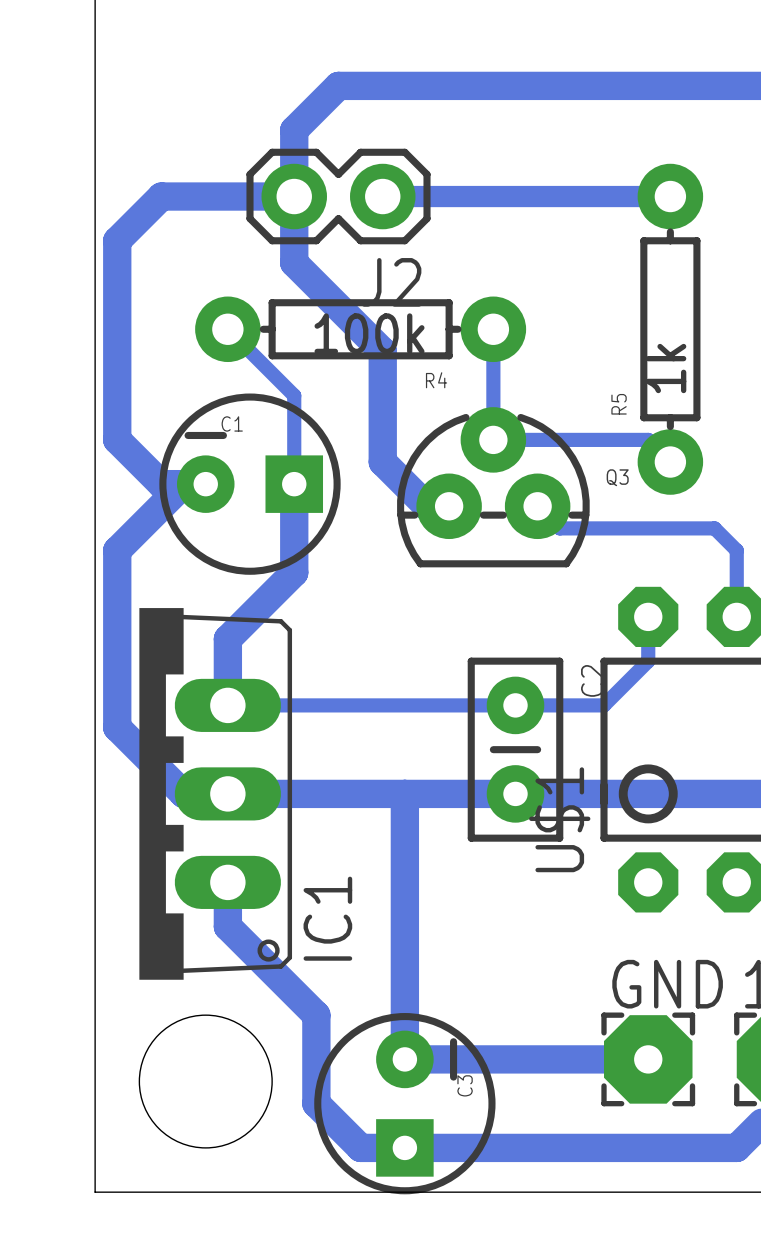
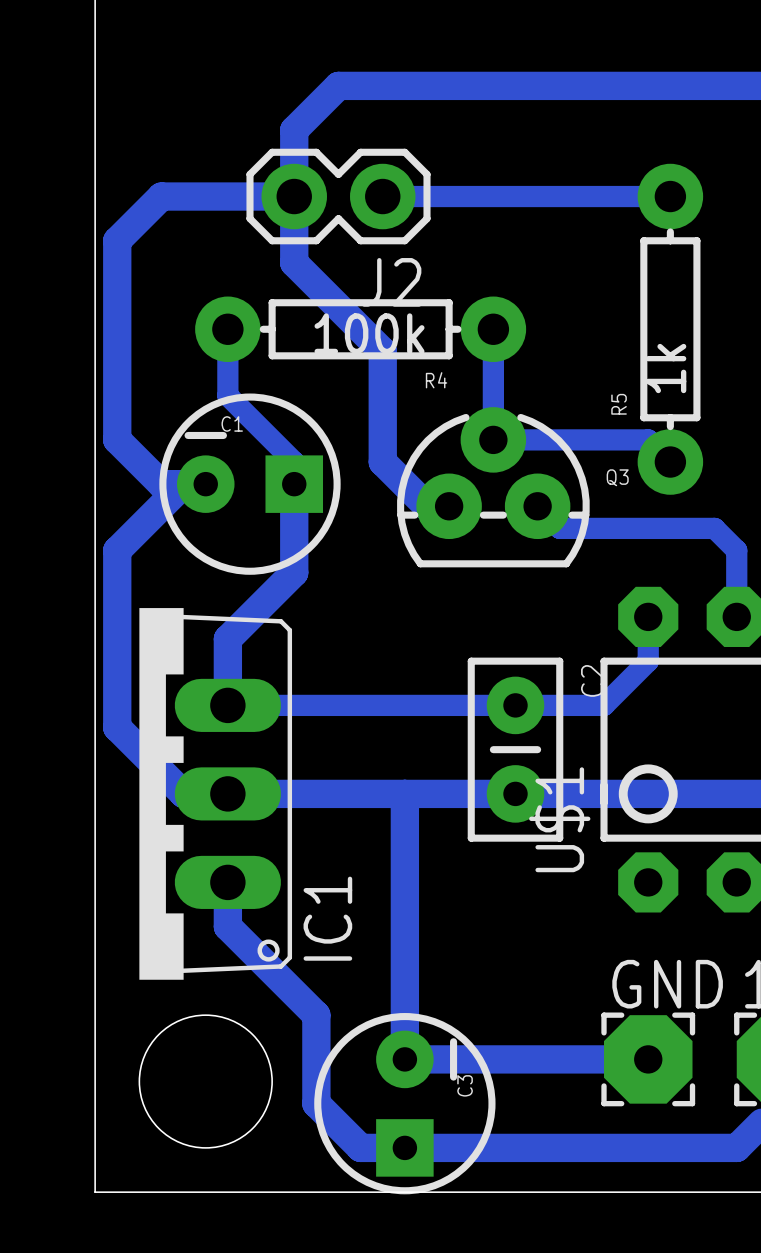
bottom track: (227, 329) (294, 395) (294, 462) -> (227, 329) (227, 395) (294, 462)
bottom track width: thin (493, 329) (493, 439) (648, 439) (670, 462) -> thick (493, 329) (493, 439) (648, 439) (670, 462)
bottom track width: thin (537, 506) (559, 528) (714, 528) (736, 550) (736, 616) -> thick (537, 506) (559, 528) (714, 528) (736, 550) (736, 616)
bottom track width: thin (648, 616) (648, 661) (604, 705) (227, 705) -> thick (648, 616) (648, 661) (604, 705) (227, 705)

